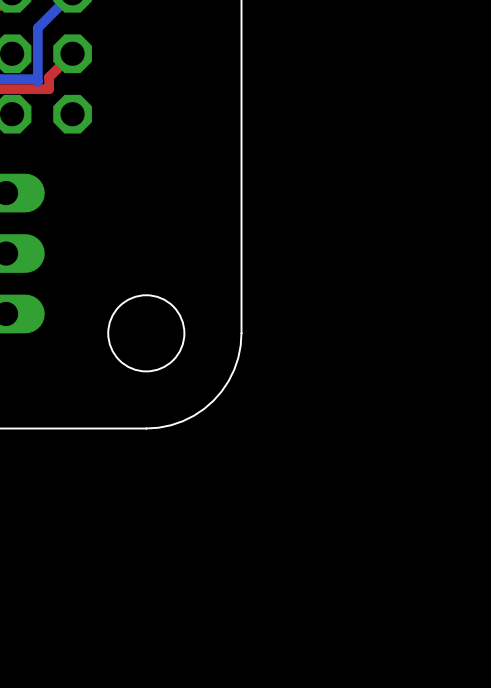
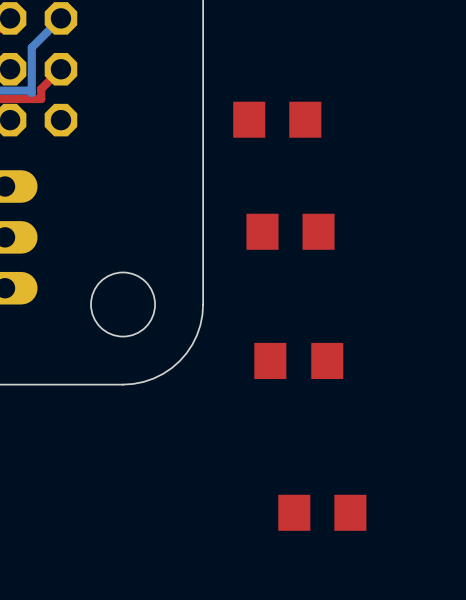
part: none -> (277, 119)
part: none -> (290, 231)
part: none -> (298, 360)
part: none -> (322, 512)

